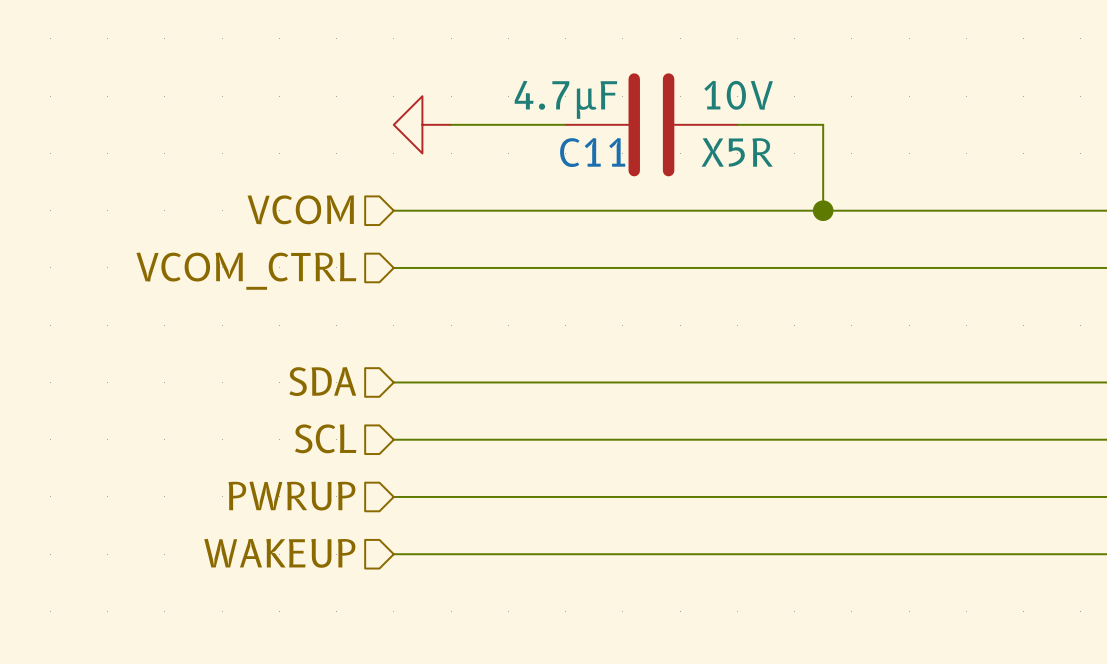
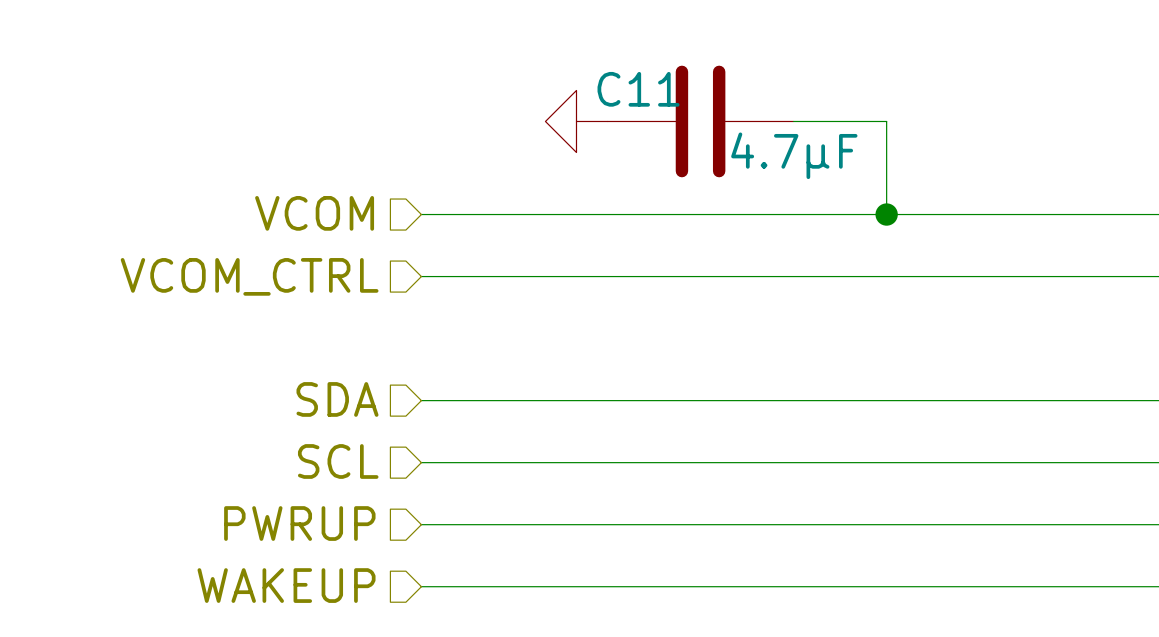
C11 text: 10V (738, 95) -> none
C11 value position: 4.7µF (565, 99) -> 4.7µF (794, 155)
power symbol position: (422, 124) -> (576, 121)
wire: (451, 124) (565, 124) -> none
C11 name position: C11 (592, 152) -> C11 (638, 89)
C11 text: X5R (737, 152) -> none

